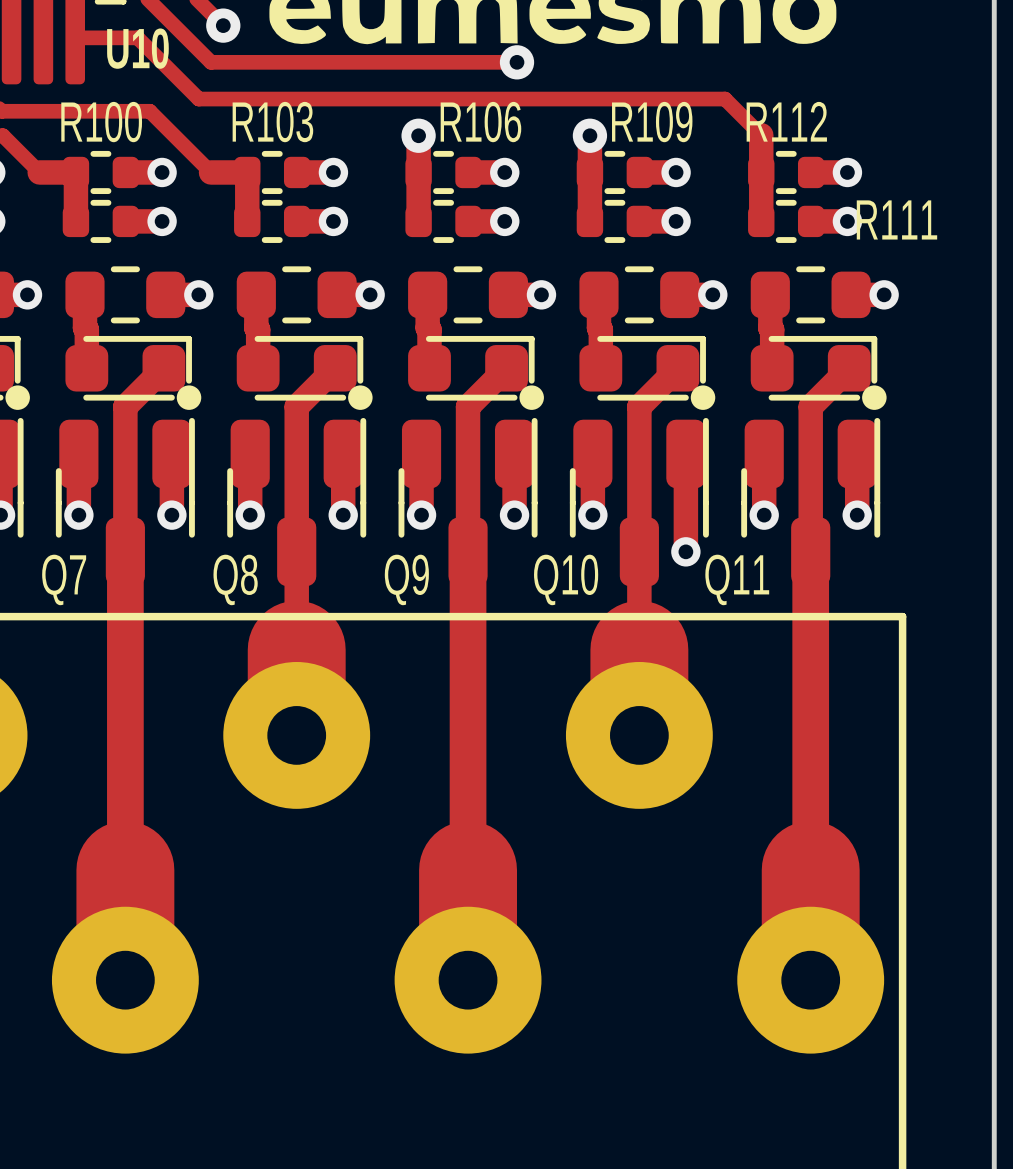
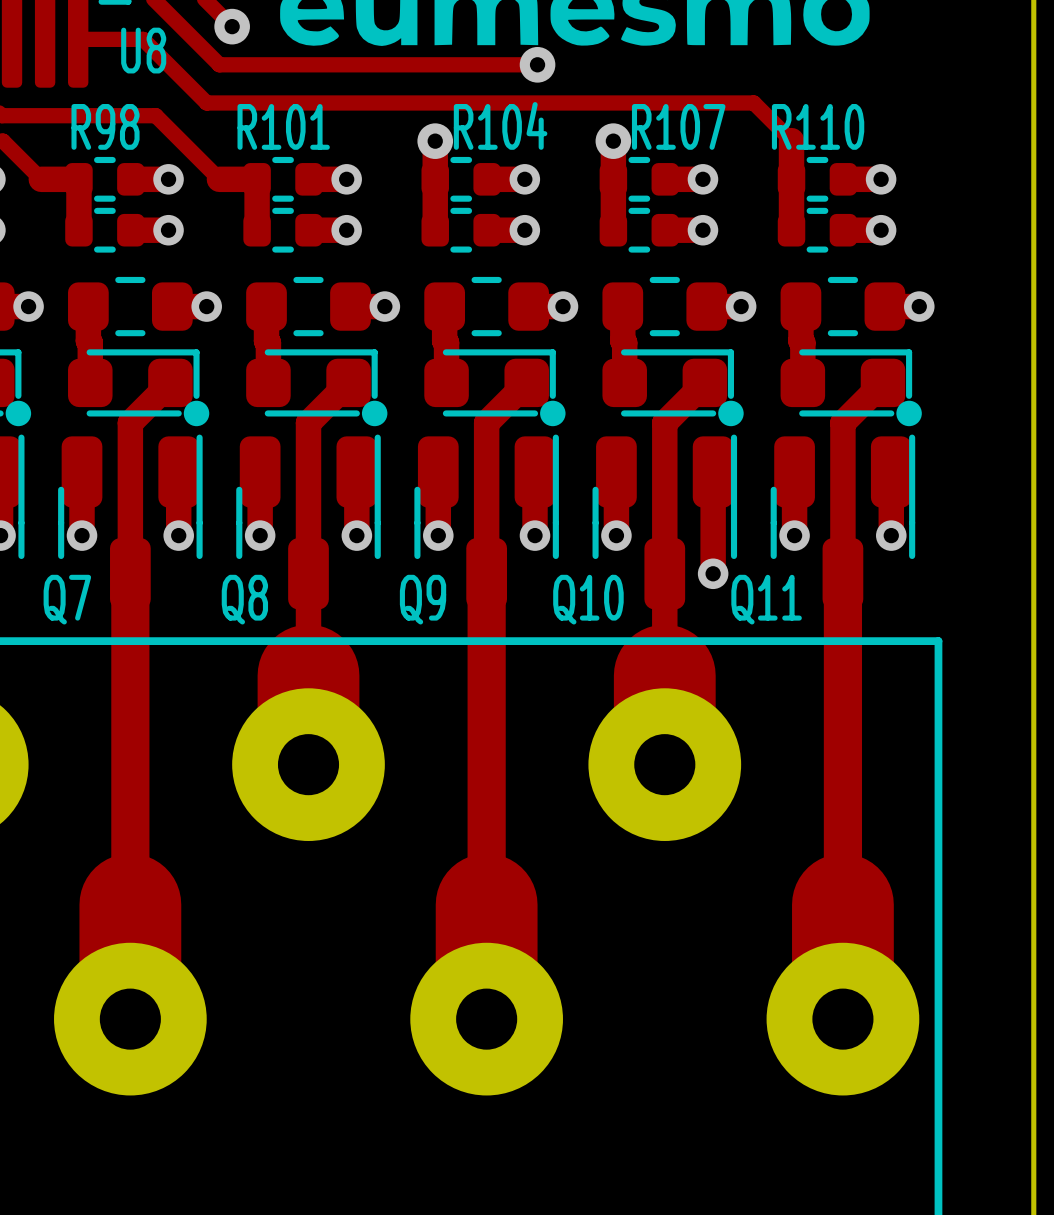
U10 name: U10 (137, 48) -> U8 (143, 50)
R112 name: R112 (786, 121) -> R110 (818, 126)
R100 name: R100 (101, 122) -> R98 (105, 126)
R103 name: R103 (272, 122) -> R101 (283, 126)
R106 name: R106 (480, 122) -> R104 (500, 125)
R109 name: R109 (652, 122) -> R107 (678, 126)
R111 name: R111 (896, 219) -> none

